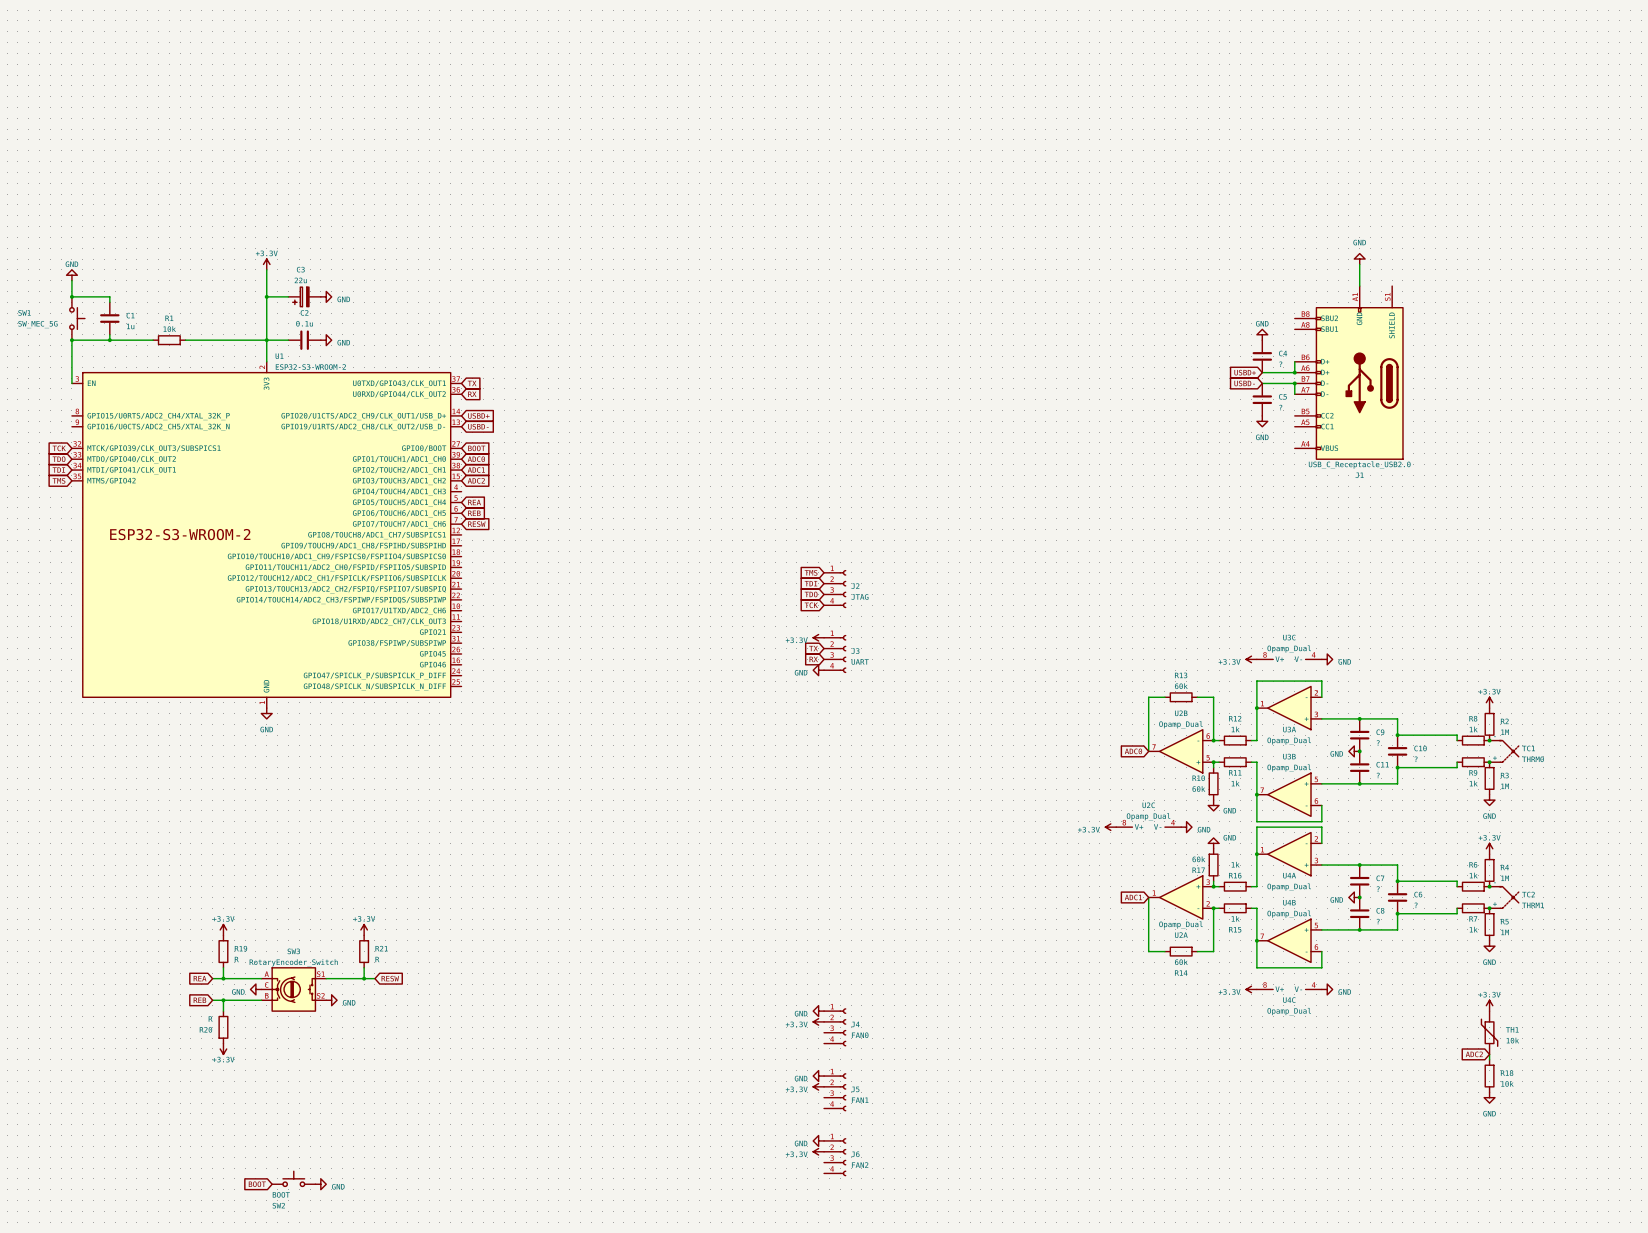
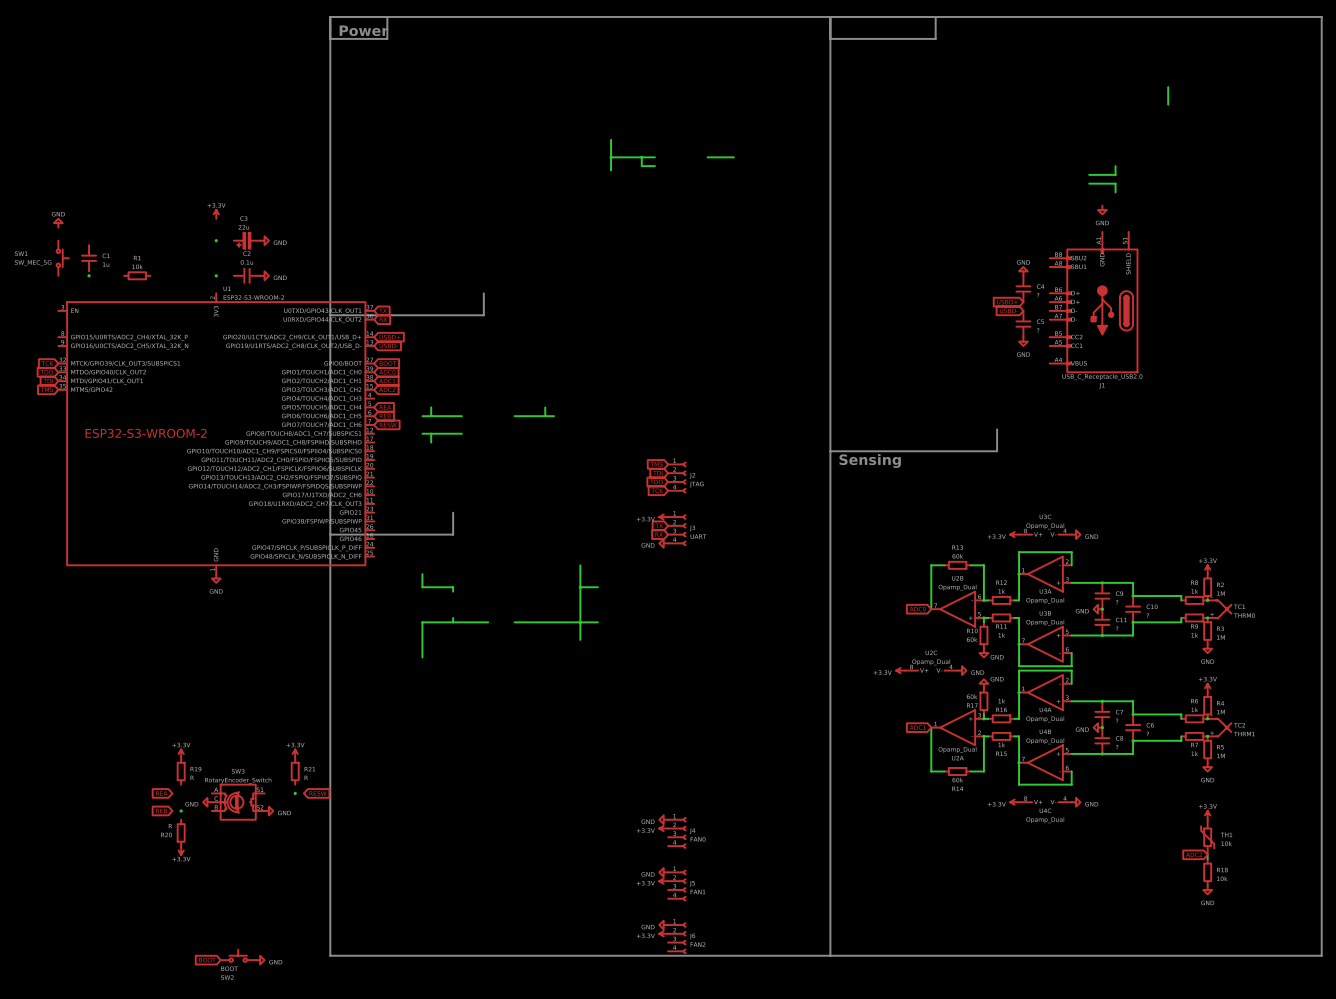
line: none -> (330, 16) (1321, 16) (1321, 955) (330, 955) (330, 16)
line: none -> (387, 16) (387, 38) (330, 38)
line: none -> (830, 16) (830, 955)
line: none -> (935, 16) (935, 38) (830, 38)
text: none -> Power (363, 30)
wire: none -> (1168, 87) (1168, 104)
wire: none -> (611, 139) (611, 170)
wire: none -> (611, 157) (654, 157)
wire: none -> (641, 157) (641, 166) (654, 166)
wire: none -> (707, 157) (733, 157)
wire: none -> (1115, 166) (1115, 174) (1089, 174)
wire: none -> (1089, 183) (1115, 183) (1115, 192)
power symbol rotation: 0° (1359, 259) -> 180° (1102, 209)
wire: (1359, 264) (1359, 286) -> none
wire: (266, 269) (266, 361) -> none
wire: (71, 280) (71, 296) (109, 296) (109, 302) -> none
junction: (71, 296) -> none
wire: (266, 296) (288, 296) -> none
wire: (109, 334) (109, 340) -> none
junction: (71, 340) -> none
wire: (153, 340) (71, 340) (71, 383) -> none
wire: (185, 340) (288, 340) -> none
line: none -> (483, 293) (483, 315) (330, 315)
wire: (1294, 361) (1294, 372) (1262, 372) -> none
junction: (1294, 372) -> none
wire: (1262, 383) (1294, 383) (1294, 394) -> none
junction: (1294, 383) -> none
wire: none -> (431, 407) (431, 416)
wire: none -> (545, 407) (545, 416)
wire: none -> (422, 416) (461, 416)
wire: none -> (514, 416) (554, 416)
line: none -> (997, 429) (997, 451) (830, 451)
wire: none -> (422, 433) (461, 433)
wire: none -> (431, 433) (431, 442)
text: none -> Sensing (870, 461)
line: none -> (453, 512) (453, 534) (330, 534)
wire: none -> (580, 565) (580, 639)
wire: none -> (422, 574) (422, 587) (453, 587) (453, 591)
wire: none -> (580, 587) (597, 587)
wire: none -> (453, 617) (453, 622)
wire: none -> (488, 622) (422, 622) (422, 657)
wire: none -> (514, 622) (597, 622)
wire: (223, 967) (223, 978) -> none
wire: (364, 967) (364, 978) -> none
wire: (212, 978) (261, 978) -> none
junction: (223, 978) -> none
wire: (326, 978) (374, 978) -> none
wire: (212, 1000) (261, 1000) -> none
wire: (223, 1000) (223, 1011) -> none

